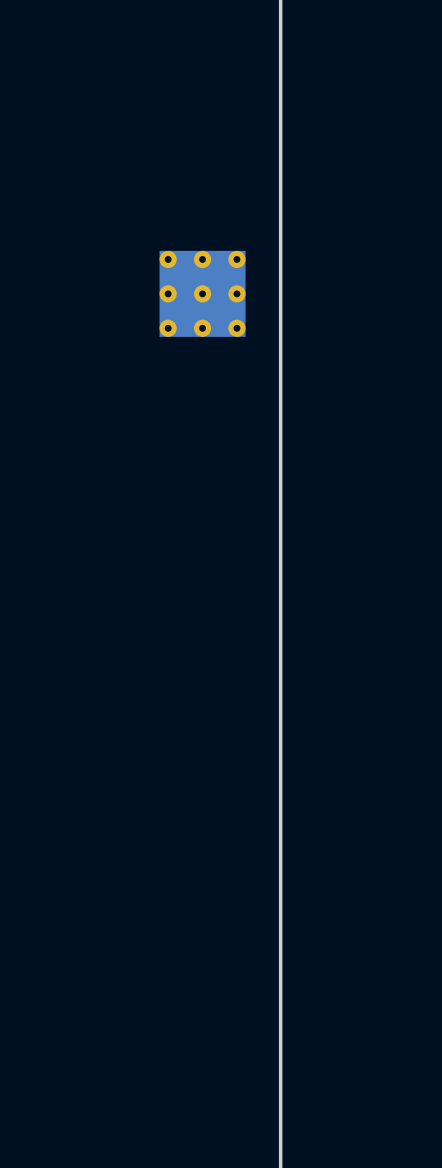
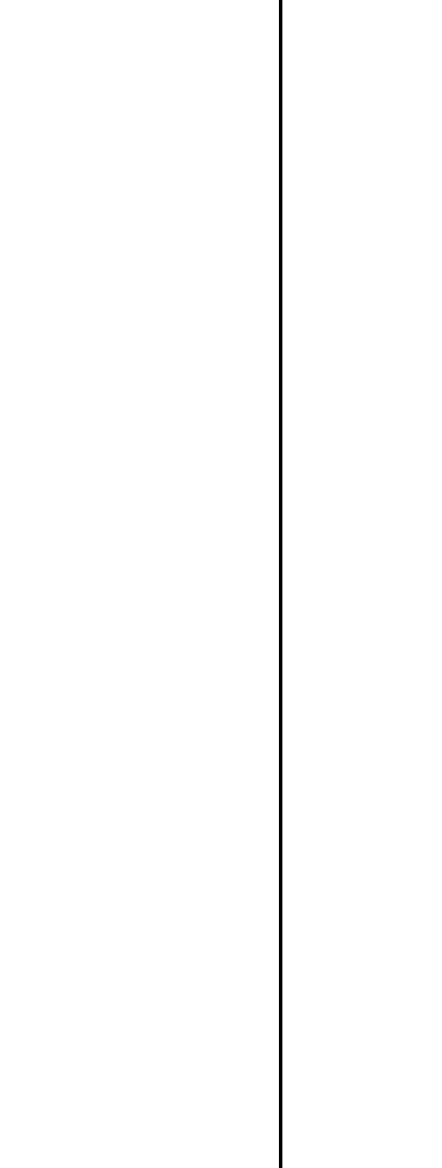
part: (202, 293) -> none

